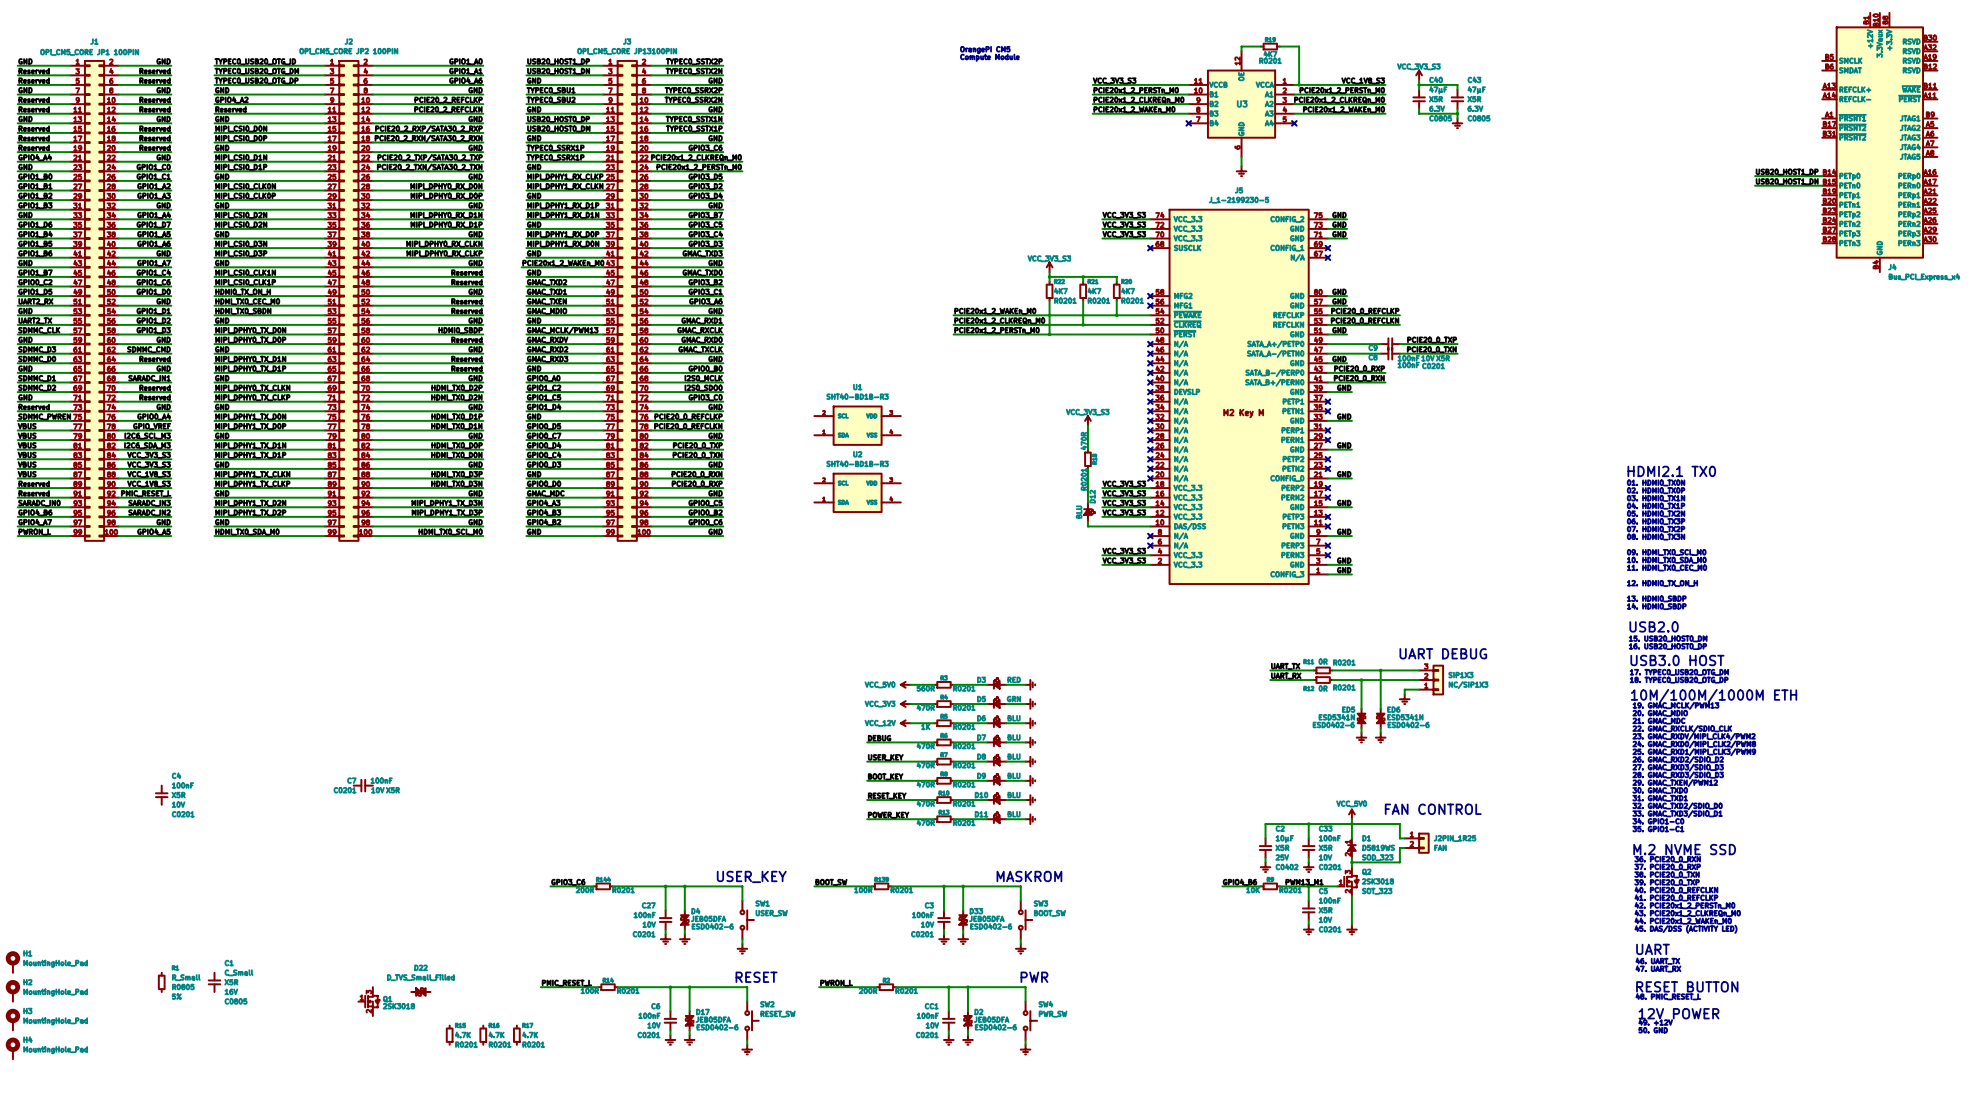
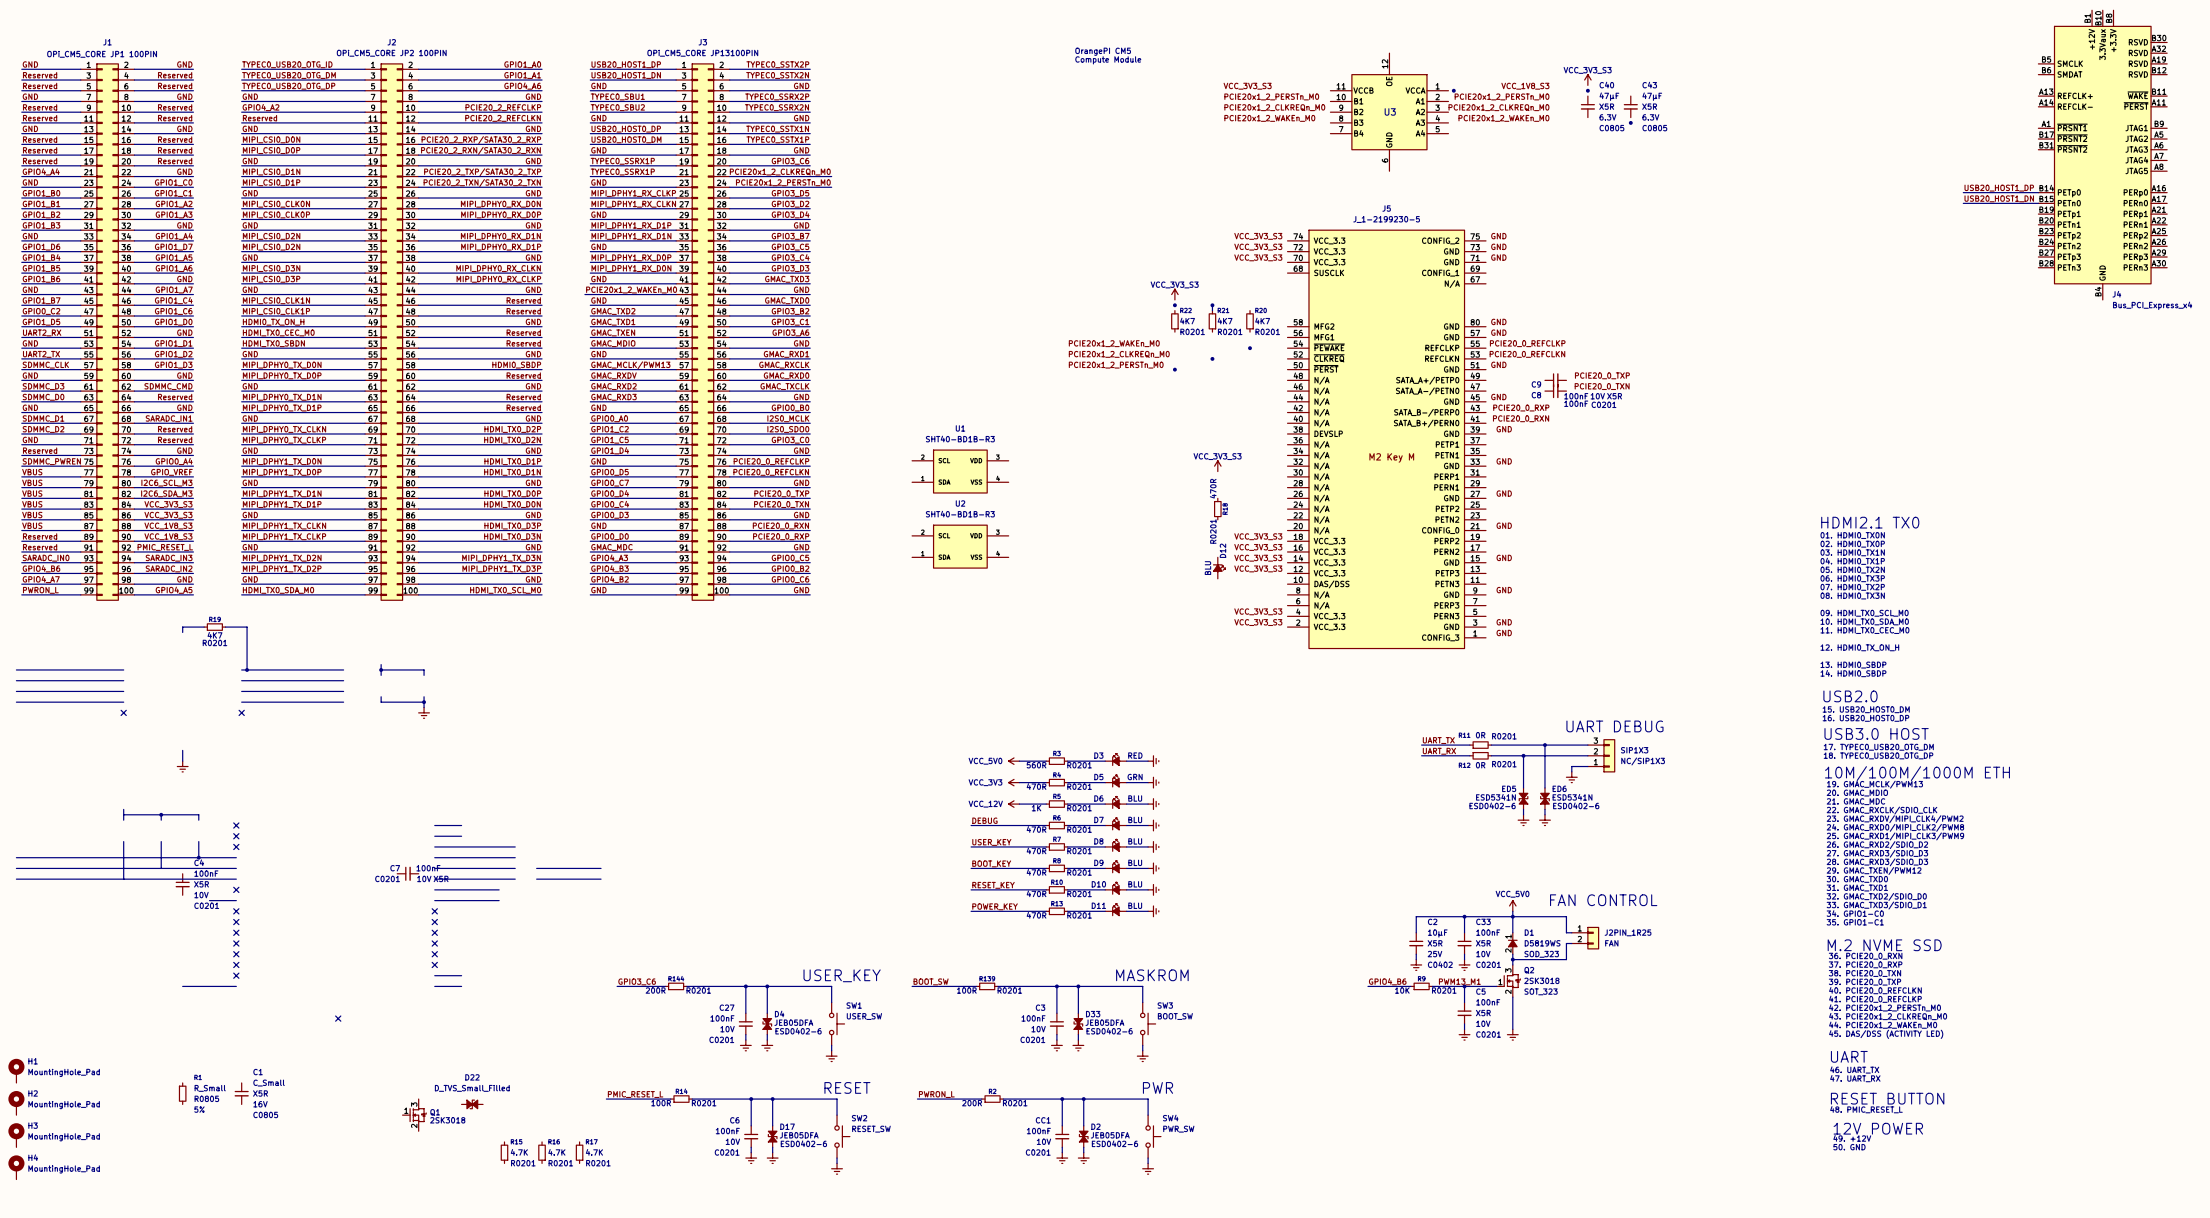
wire: (1260, 46) (1241, 46) (1241, 51) -> none
part position: (1270, 46) -> (214, 627)
wire: (1279, 46) (1299, 46) (1299, 84) -> none
wire: (1419, 80) (1419, 89) -> none
wire: (1092, 84) (1188, 84) -> none
wire: (1294, 84) (1385, 84) -> none
wire: (1419, 84) (1457, 84) (1457, 89) -> none
wire: (1092, 94) (1188, 94) -> none
wire: (1294, 94) (1385, 94) -> none
wire: (1092, 104) (1188, 104) -> none
wire: (1294, 104) (1385, 104) -> none
wire: (1419, 108) (1419, 113) (1457, 113) -> none
wire: (1457, 108) (1457, 118) -> none
wire: (1092, 113) (1188, 113) -> none
wire: (1294, 113) (1385, 113) -> none
no-connect mark: (1188, 123) -> none
no-connect mark: (1294, 123) -> none
power symbol: (1457, 123) -> none
wire: (1241, 156) (1241, 166) -> none
power symbol: (1241, 171) -> none
wire: (1102, 219) (1150, 219) -> none
wire: (1327, 219) (1347, 219) -> none
wire: (1102, 228) (1150, 228) -> none
wire: (1327, 228) (1347, 228) -> none
wire: (1102, 238) (1150, 238) -> none
wire: (1327, 238) (1347, 238) -> none
no-connect mark: (1150, 248) -> none
no-connect mark: (1327, 248) -> none
no-connect mark: (1327, 257) -> none
wire: (1049, 272) (1049, 281) -> none
wire: (1049, 276) (1116, 276) (1116, 281) -> none
no-connect mark: (1150, 296) -> none
wire: (1327, 296) (1347, 296) -> none
wire: (1049, 300) (1049, 334) -> none
wire: (1083, 300) (1083, 324) -> none
wire: (1116, 300) (1116, 315) -> none
no-connect mark: (1150, 305) -> none
wire: (1327, 305) (1347, 305) -> none
wire: (953, 315) (1150, 315) -> none
wire: (1327, 315) (1399, 315) -> none
wire: (953, 324) (1150, 324) -> none
wire: (1327, 324) (1399, 324) -> none
wire: (953, 334) (1150, 334) -> none
wire: (1327, 334) (1347, 334) -> none
no-connect mark: (1150, 344) -> none
wire: (1327, 344) (1380, 344) -> none
wire: (1399, 344) (1457, 344) -> none
no-connect mark: (1150, 353) -> none
wire: (1327, 353) (1380, 353) -> none
wire: (1399, 353) (1457, 353) -> none
no-connect mark: (1150, 363) -> none
wire: (1327, 363) (1347, 363) -> none
no-connect mark: (1150, 372) -> none
wire: (1327, 372) (1385, 372) -> none
no-connect mark: (1150, 382) -> none
wire: (1327, 382) (1385, 382) -> none
no-connect mark: (1150, 392) -> none
wire: (1327, 392) (1351, 392) -> none
no-connect mark: (1150, 401) -> none
no-connect mark: (1327, 401) -> none
no-connect mark: (1150, 411) -> none
no-connect mark: (1327, 411) -> none
no-connect mark: (1150, 420) -> none
wire: (1327, 420) (1351, 420) -> none
wire: (1087, 425) (1087, 449) -> none
no-connect mark: (1150, 430) -> none
no-connect mark: (1327, 430) -> none
no-connect mark: (1150, 440) -> none
no-connect mark: (1327, 440) -> none
no-connect mark: (1150, 449) -> none
wire: (1327, 449) (1351, 449) -> none
no-connect mark: (1150, 459) -> none
no-connect mark: (1327, 459) -> none
wire: (1087, 468) (1087, 502) -> none
no-connect mark: (1150, 468) -> none
no-connect mark: (1327, 468) -> none
no-connect mark: (1150, 478) -> none
wire: (1327, 478) (1351, 478) -> none
wire: (1102, 488) (1150, 488) -> none
no-connect mark: (1327, 488) -> none
wire: (1102, 497) (1150, 497) -> none
no-connect mark: (1327, 497) -> none
wire: (1102, 507) (1150, 507) -> none
wire: (1327, 507) (1351, 507) -> none
wire: (1102, 516) (1150, 516) -> none
no-connect mark: (1327, 516) -> none
wire: (1087, 521) (1087, 526) (1150, 526) -> none
no-connect mark: (1327, 526) -> none
no-connect mark: (1150, 536) -> none
wire: (1327, 536) (1351, 536) -> none
no-connect mark: (1150, 545) -> none
no-connect mark: (1327, 545) -> none
wire: (1102, 555) (1150, 555) -> none
no-connect mark: (1327, 555) -> none
wire: none -> (204, 627) (182, 627) (182, 632)
wire: none -> (225, 627) (247, 627) (247, 669)
wire: (1102, 564) (1150, 564) -> none
wire: (1327, 564) (1351, 564) -> none
wire: (1327, 574) (1351, 574) -> none
wire: none -> (381, 664) (381, 675)
wire: none -> (16, 669) (123, 669)
wire: none -> (241, 669) (343, 669)
junction: none -> (247, 669)
wire: none -> (381, 669) (424, 669) (424, 675)
junction: none -> (381, 669)
wire: none -> (16, 680) (123, 680)
wire: none -> (241, 680) (343, 680)
wire: none -> (16, 691) (123, 691)
wire: none -> (241, 691) (343, 691)
wire: none -> (381, 696) (381, 702) (424, 702)
wire: none -> (424, 696) (424, 707)
wire: none -> (16, 702) (123, 702)
wire: none -> (241, 702) (343, 702)
junction: none -> (424, 702)
no-connect mark: none -> (123, 712)
no-connect mark: none -> (241, 712)
power symbol: none -> (424, 712)
wire: none -> (182, 750) (182, 761)
power symbol: none -> (182, 766)
wire: none -> (123, 809) (123, 820)
wire: none -> (123, 814) (198, 814) (198, 820)
wire: none -> (161, 814) (161, 820)
junction: none -> (161, 814)
no-connect mark: none -> (236, 825)
wire: none -> (434, 825) (461, 825)
no-connect mark: none -> (236, 836)
wire: none -> (434, 836) (461, 836)
wire: none -> (123, 841) (123, 879)
wire: none -> (161, 841) (161, 868)
wire: none -> (198, 841) (198, 857)
no-connect mark: none -> (236, 846)
wire: none -> (434, 846) (515, 846)
wire: none -> (16, 857) (236, 857)
junction: none -> (198, 857)
wire: none -> (434, 857) (515, 857)
wire: none -> (16, 868) (236, 868)
wire: none -> (434, 868) (515, 868)
wire: none -> (536, 868) (601, 868)
wire: none -> (16, 879) (236, 879)
wire: none -> (434, 879) (515, 879)
wire: none -> (536, 879) (601, 879)
no-connect mark: none -> (236, 889)
wire: none -> (434, 889) (499, 889)
wire: none -> (209, 900) (236, 900)
wire: none -> (434, 900) (499, 900)
no-connect mark: none -> (236, 911)
no-connect mark: none -> (434, 911)
no-connect mark: none -> (236, 922)
no-connect mark: none -> (434, 922)
no-connect mark: none -> (236, 932)
no-connect mark: none -> (434, 932)
no-connect mark: none -> (236, 943)
no-connect mark: none -> (434, 943)
no-connect mark: none -> (236, 954)
no-connect mark: none -> (434, 954)
no-connect mark: none -> (236, 964)
no-connect mark: none -> (434, 964)
no-connect mark: none -> (236, 975)
wire: none -> (434, 975) (461, 975)
wire: none -> (182, 986) (236, 986)
wire: none -> (434, 986) (461, 986)
no-connect mark: none -> (338, 1018)

